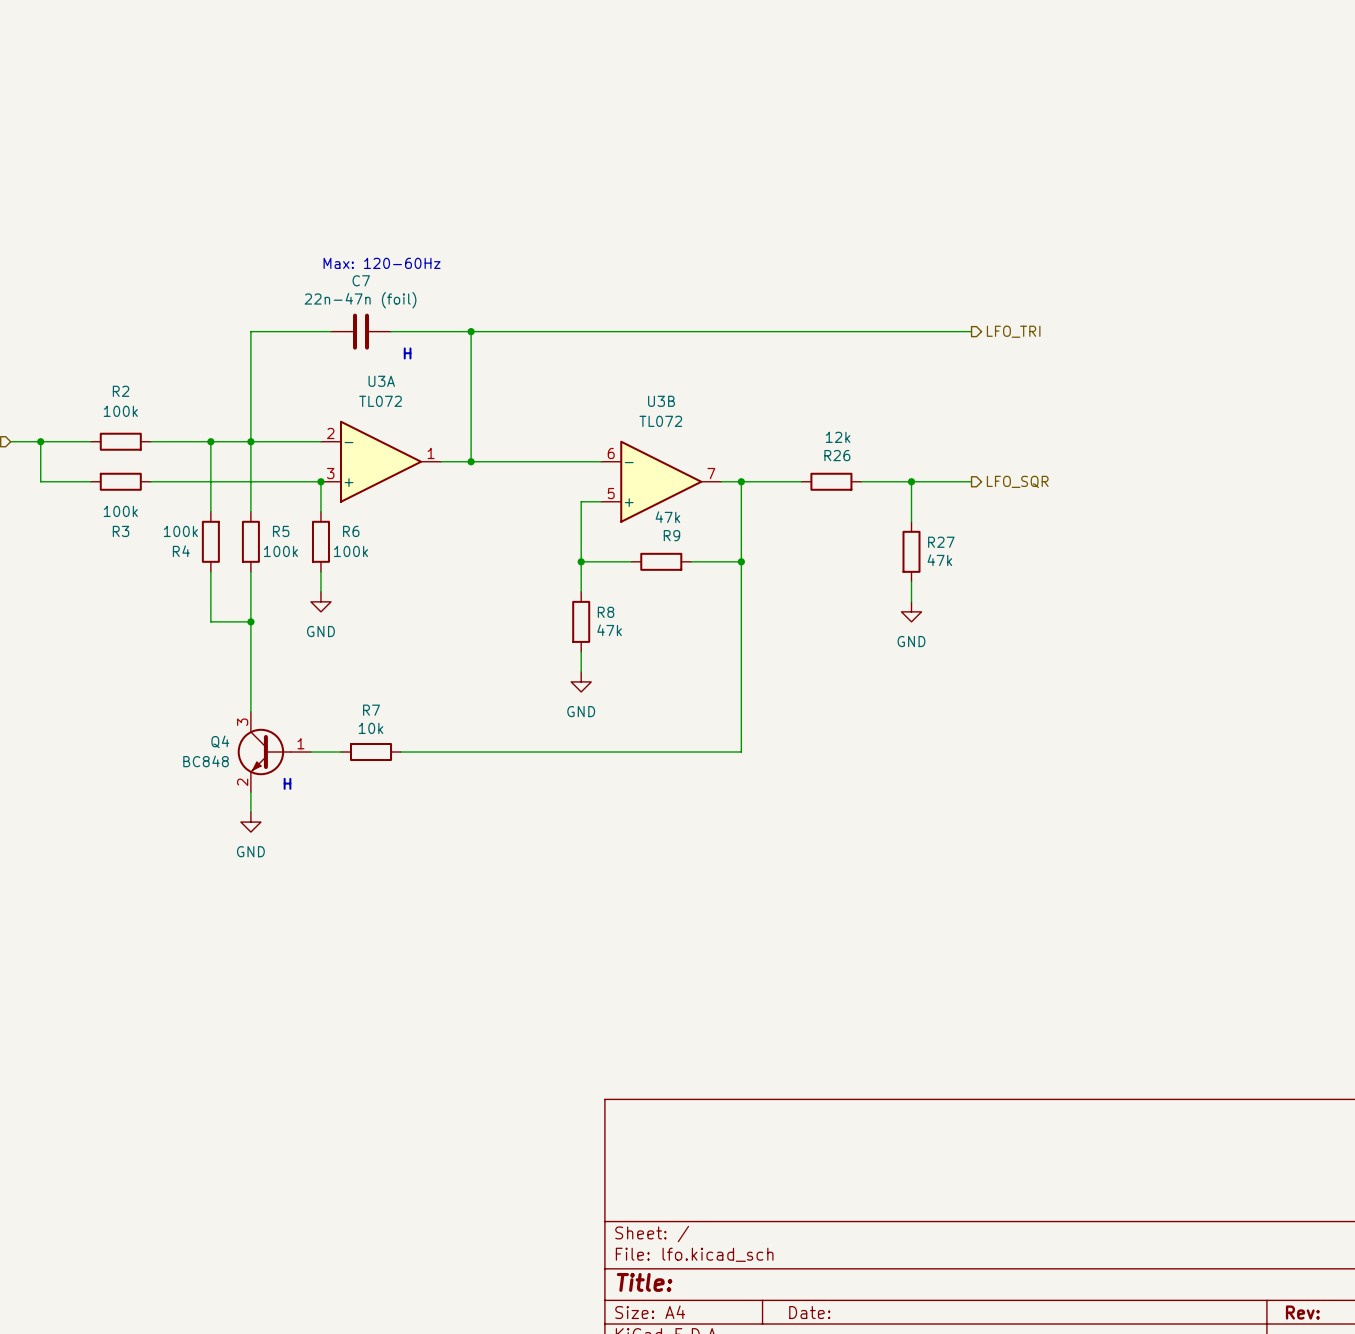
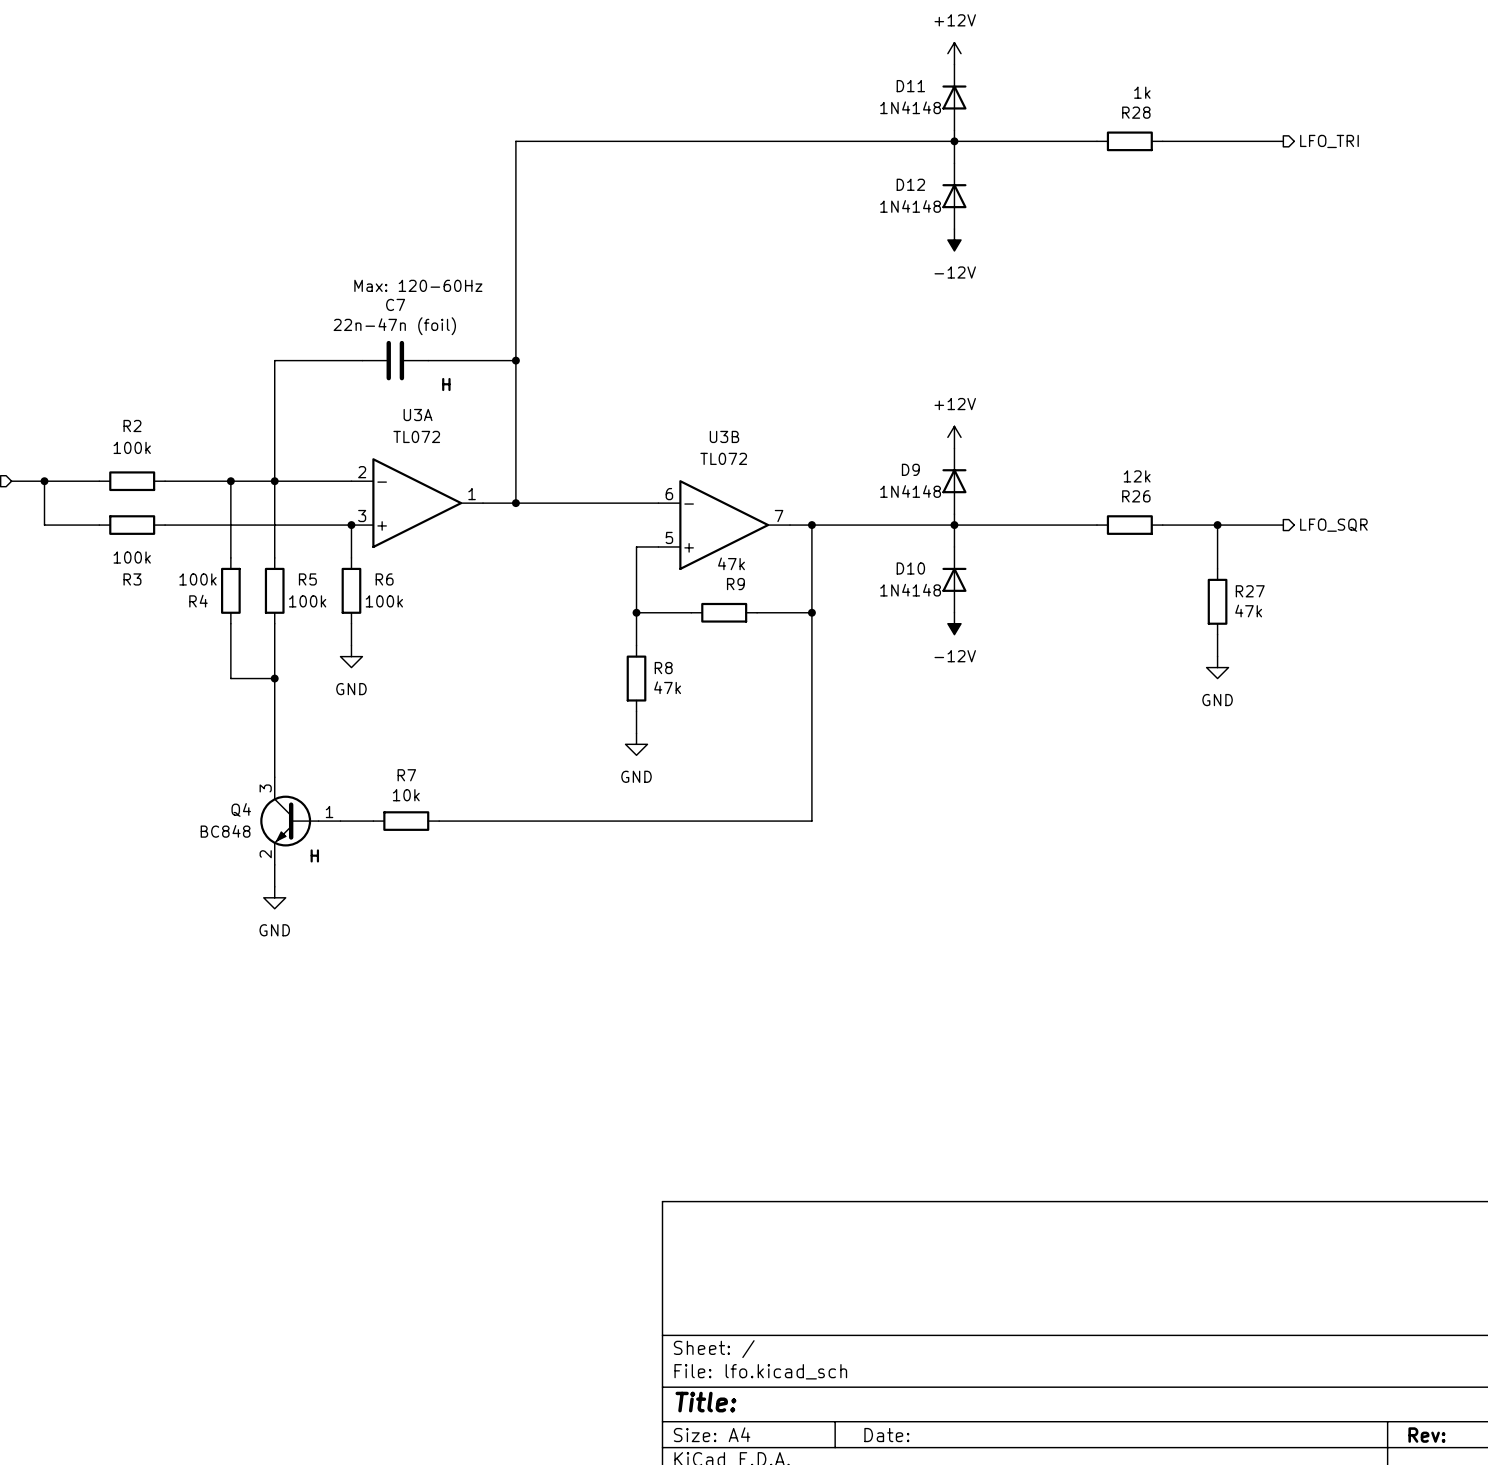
power symbol: none -> +12V (954, 53)
D11: none -> 1N4148 (954, 97)
wire: none -> (954, 130) (954, 163)
junction: none -> (954, 141)
R28: none -> 1k (1129, 141)
wire: none -> (1162, 141) (1283, 141)
hierarchical label: none -> LFO_TRI (1329, 141)
D12: none -> 1N4148 (954, 196)
power symbol: none -> -12V (954, 240)
wire: (471, 331) (971, 331) -> (515, 360) (515, 141) (1096, 141)
hierarchical label: LFO_TRI (1013, 331) -> none
power symbol: none -> +12V (954, 437)
D9: none -> 1N4148 (954, 481)
wire: none -> (954, 514) (954, 546)
wire: none -> (877, 525) (943, 525)
R26 position: (831, 481) -> (1129, 525)
wire: (911, 481) (911, 521) -> none
junction position: (911, 481) -> (954, 525)
wire: none -> (1064, 525) (1096, 525)
hierarchical label: LFO_SQR (1017, 481) -> none
wire: none -> (1162, 525) (1283, 525)
wire: none -> (1217, 525) (1217, 568)
junction: none -> (1217, 525)
hierarchical label: none -> LFO_SQR (1333, 525)
D10: none -> 1N4148 (954, 579)
R27 position: (911, 551) -> (1217, 601)
power symbol: none -> -12V (954, 623)
wire: (911, 581) (911, 601) -> none
wire: none -> (1217, 634) (1217, 656)
power symbol: GND (911, 611) -> none
power symbol: none -> GND (1217, 667)

